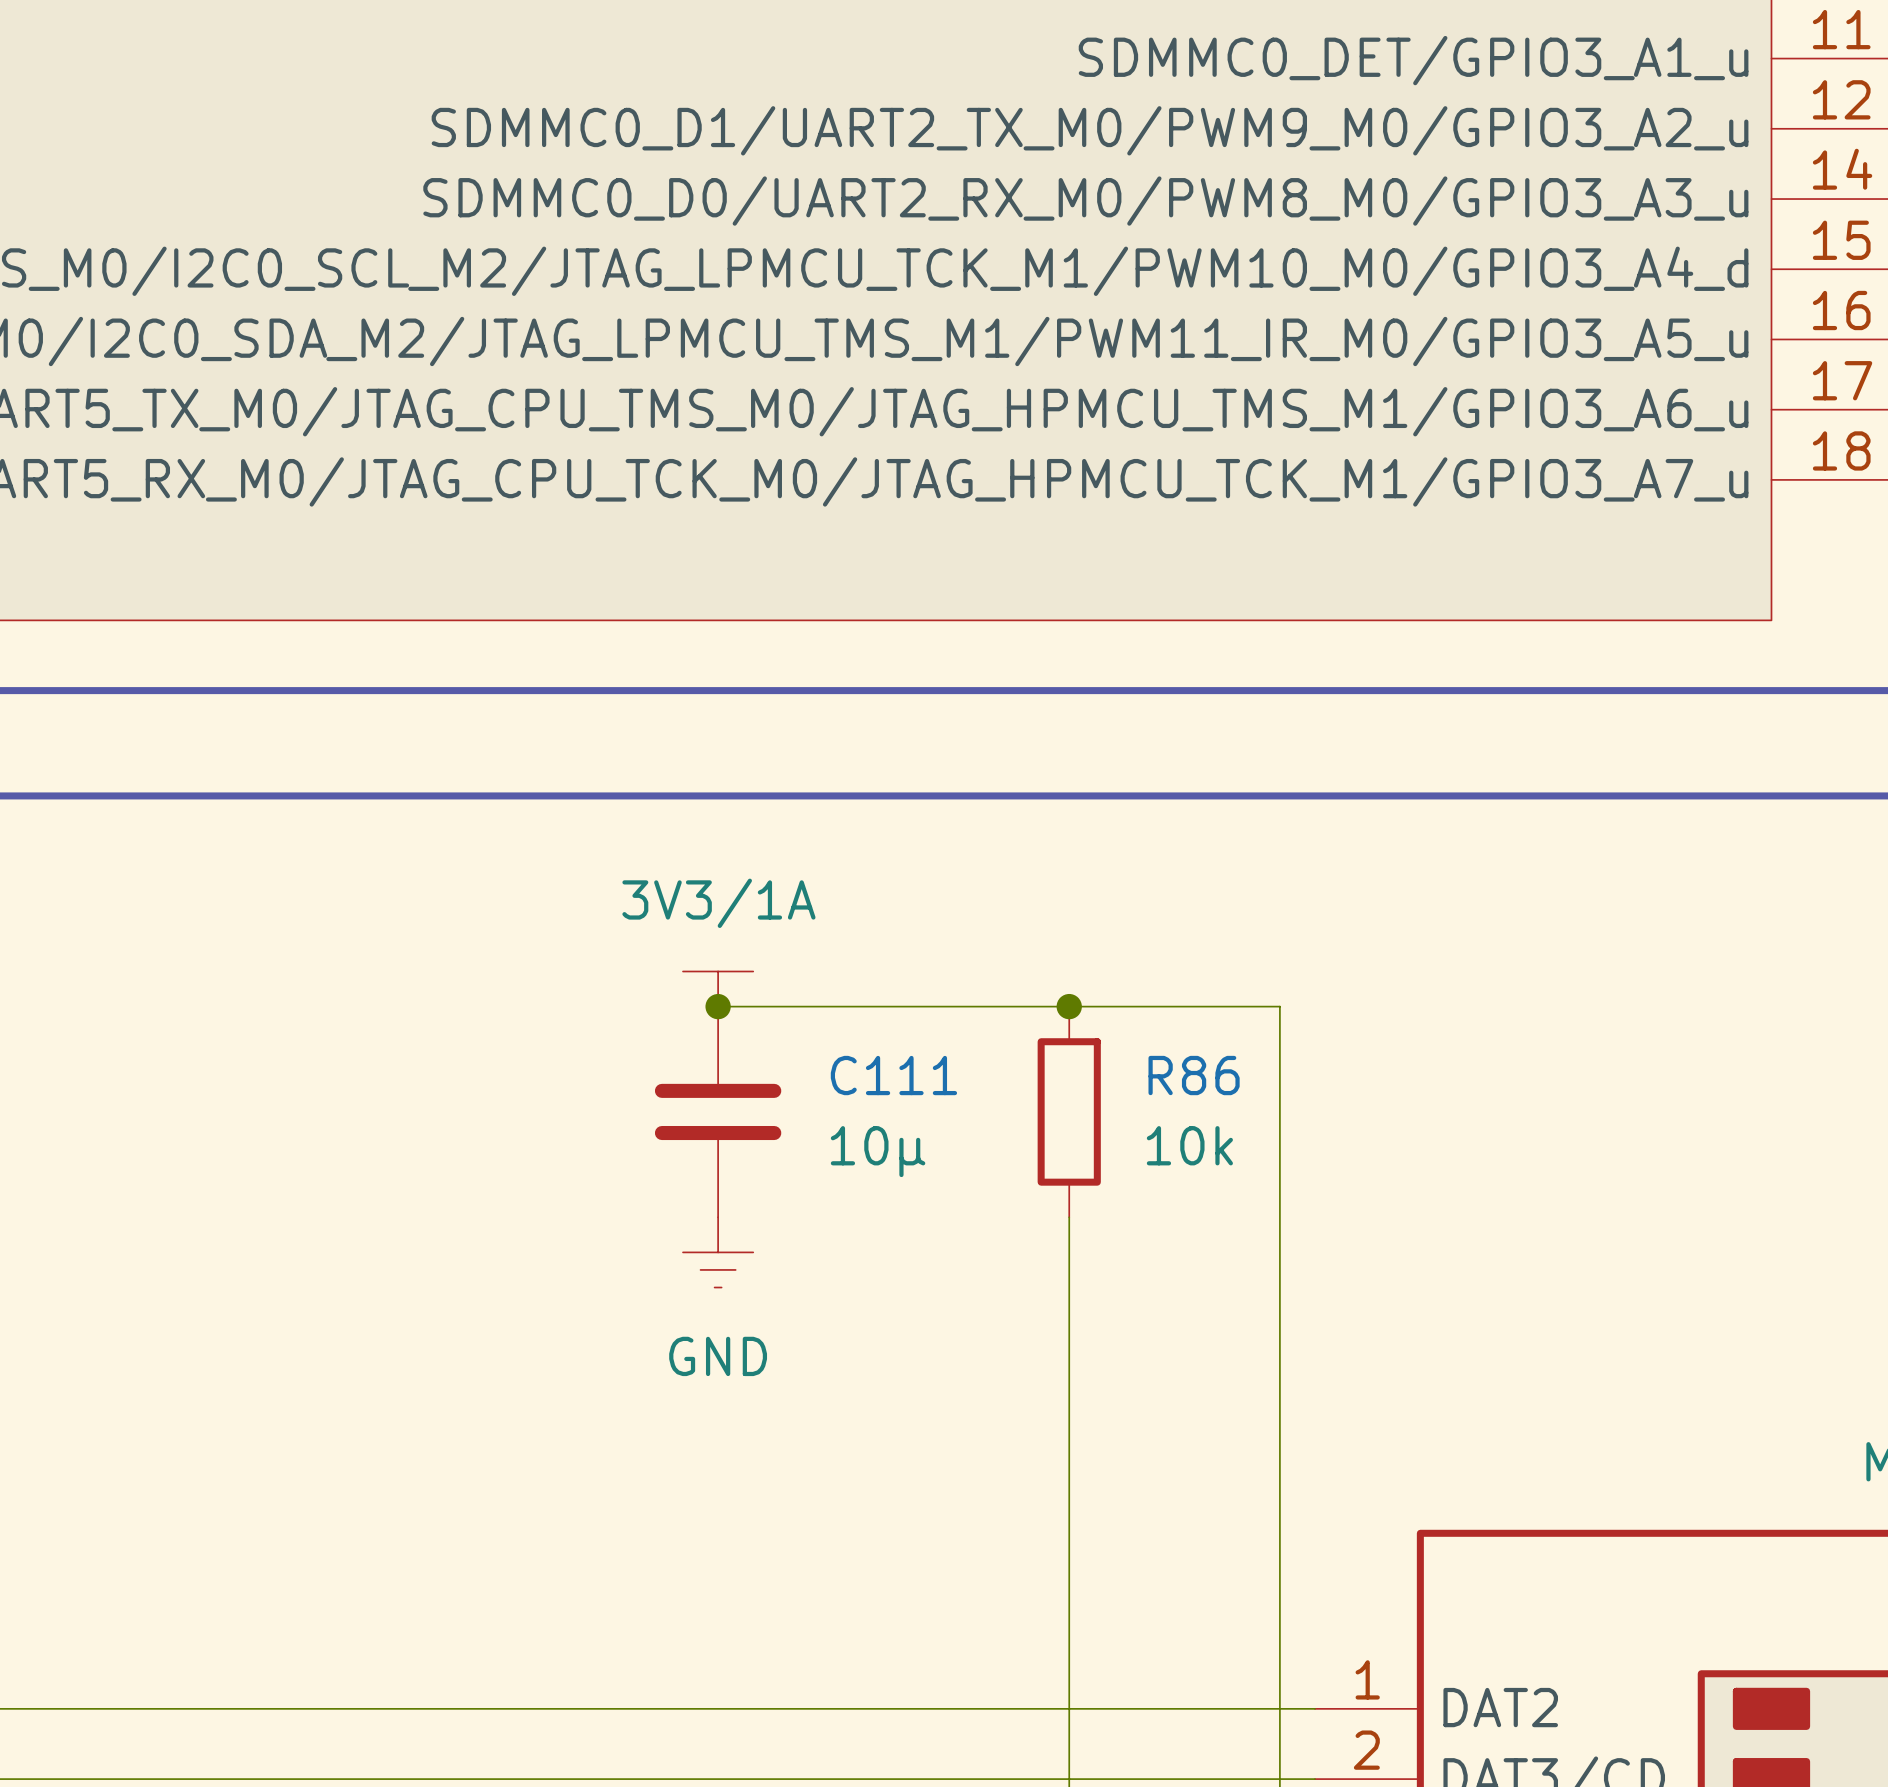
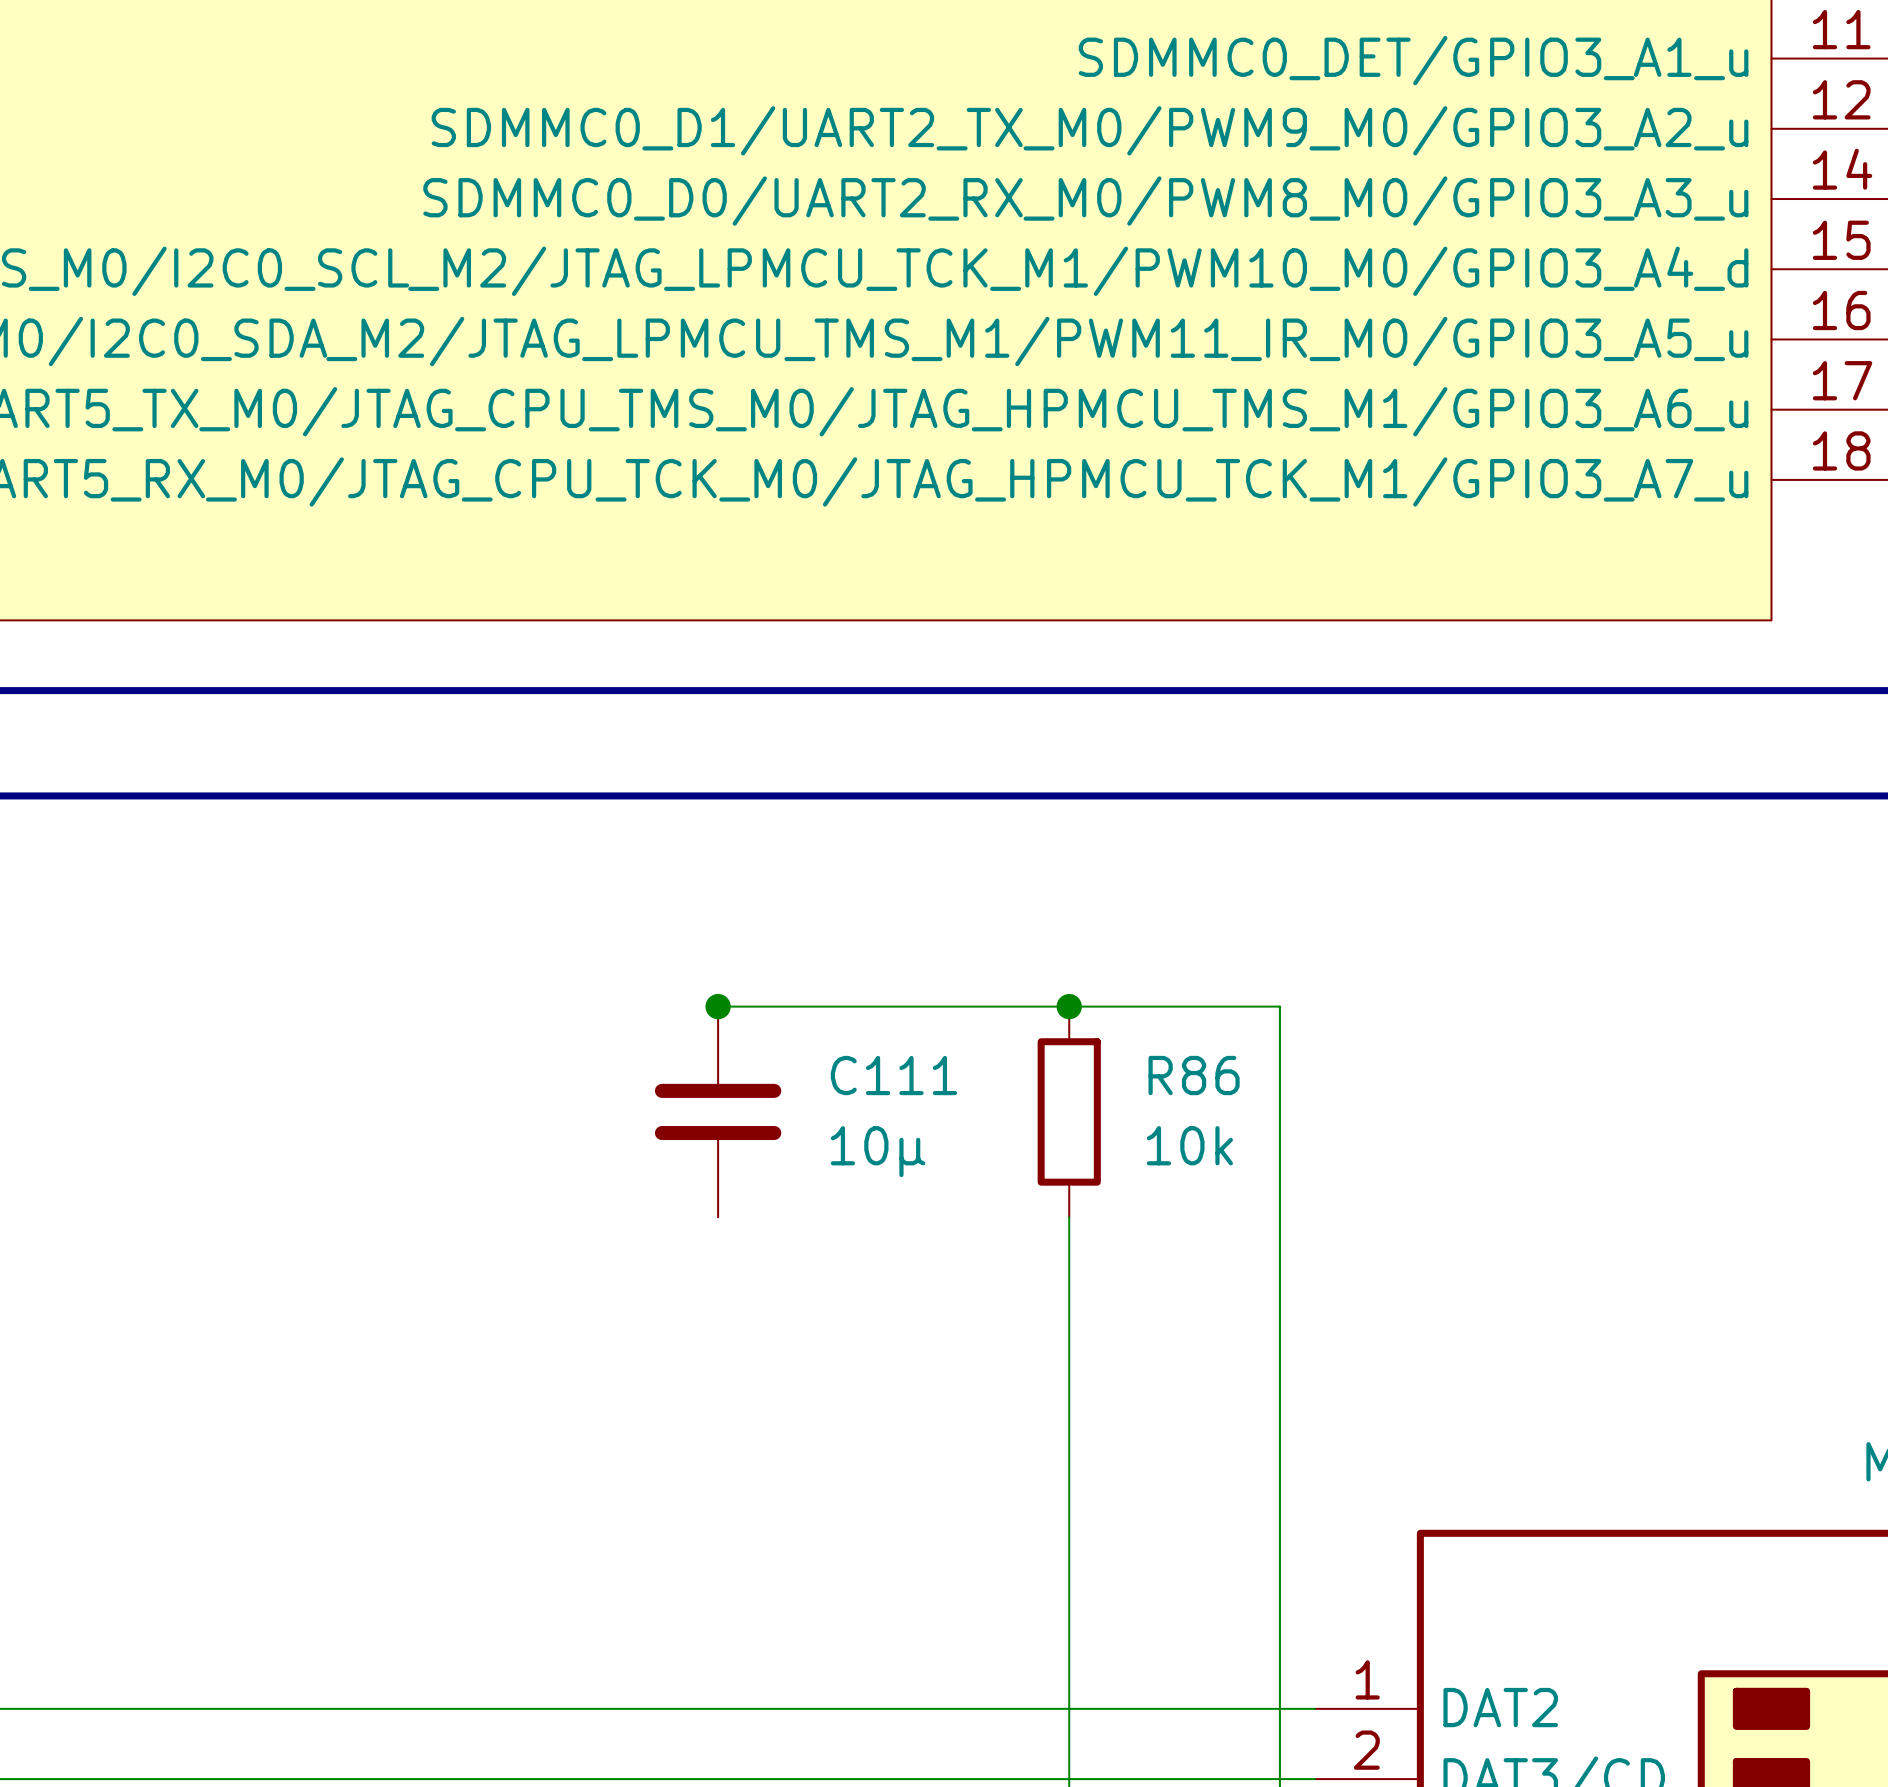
power symbol: 3V3/1A (718, 989) -> none
power symbol: GND (718, 1252) -> none

